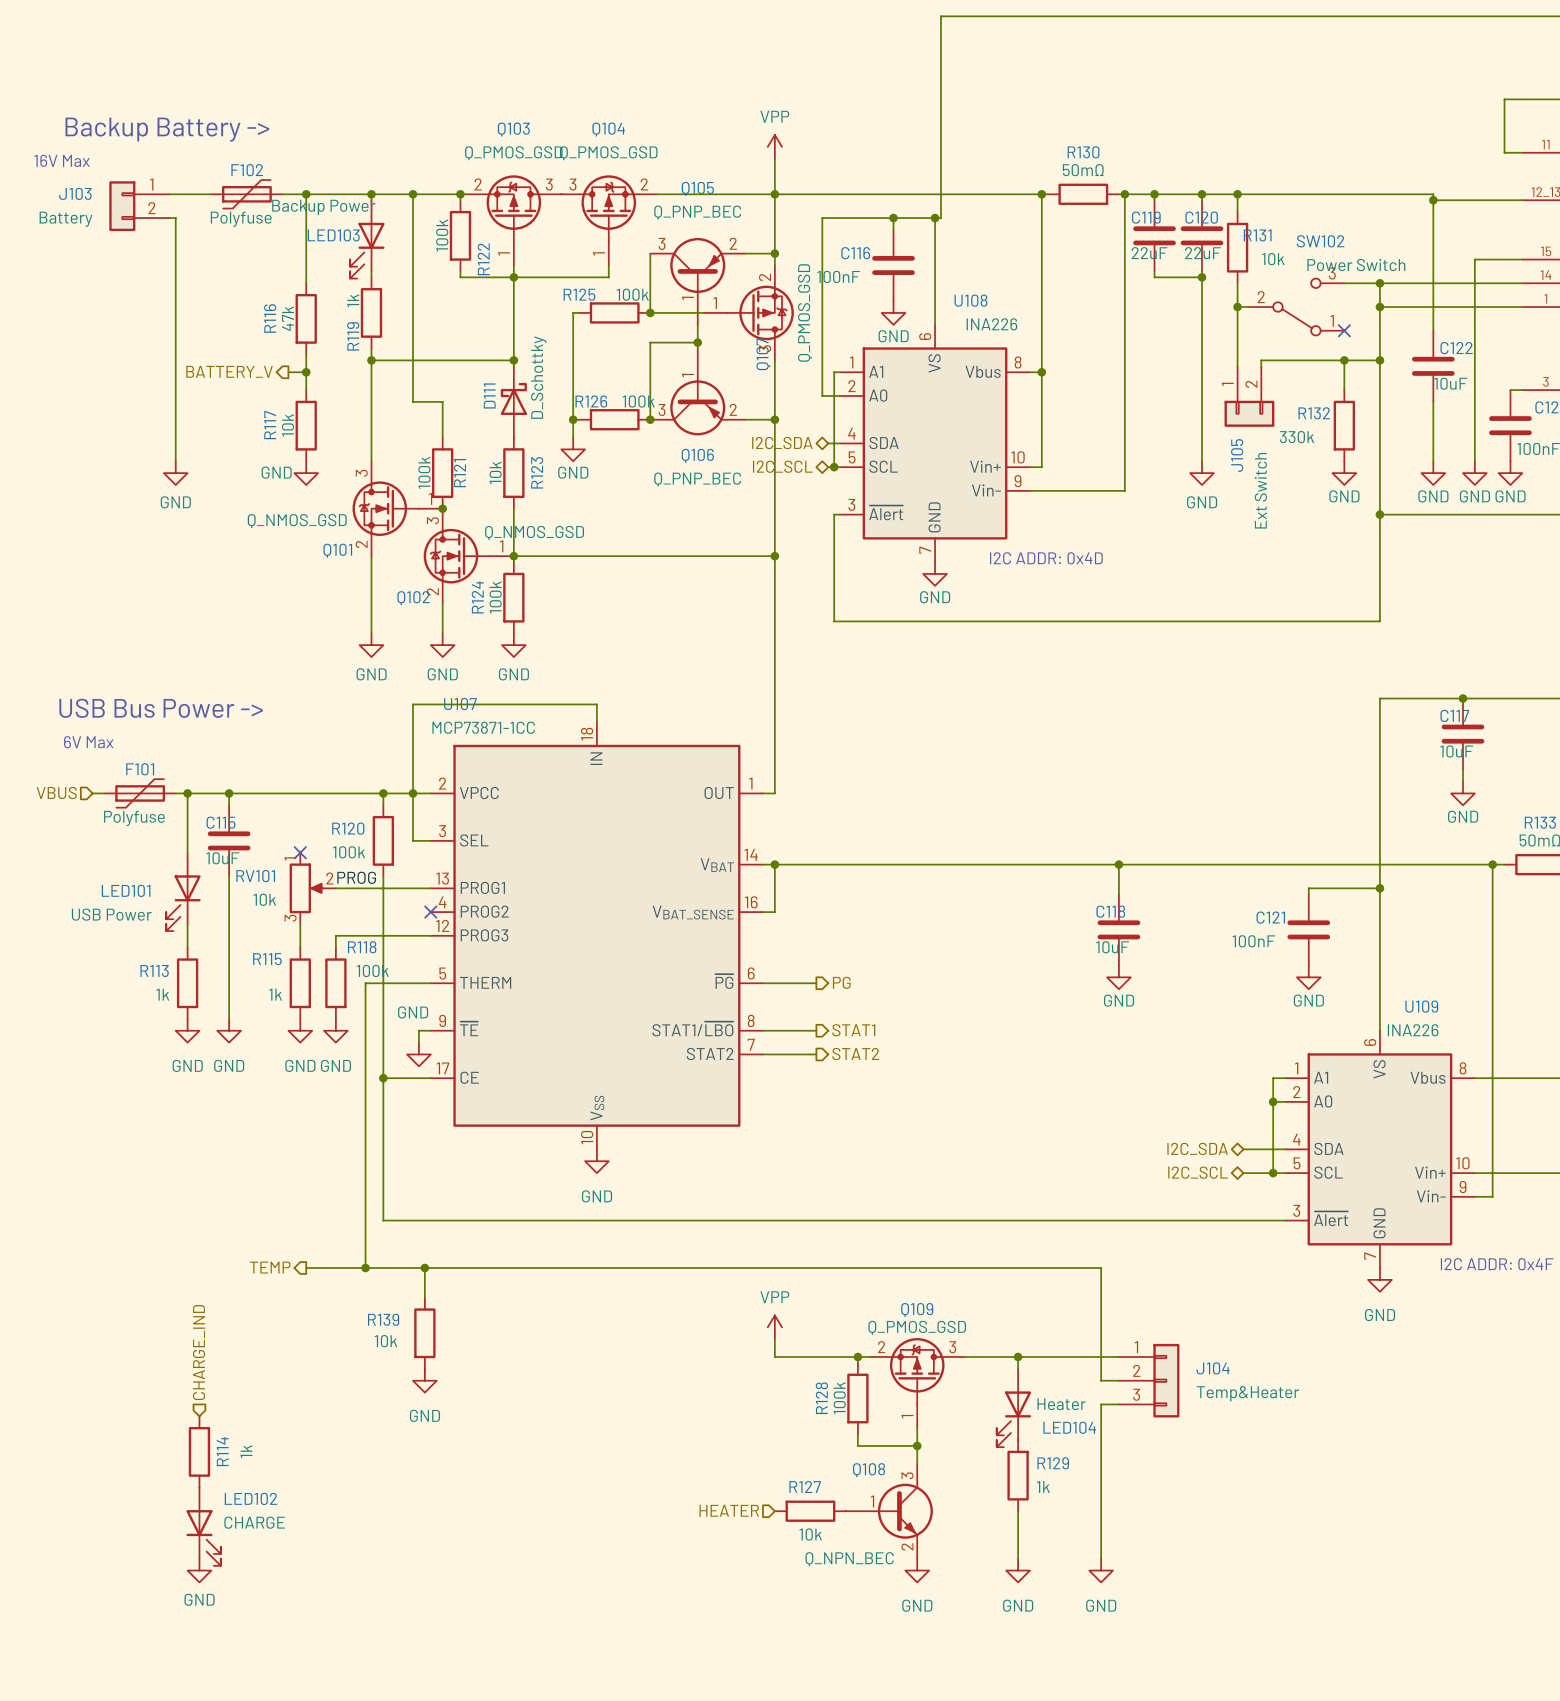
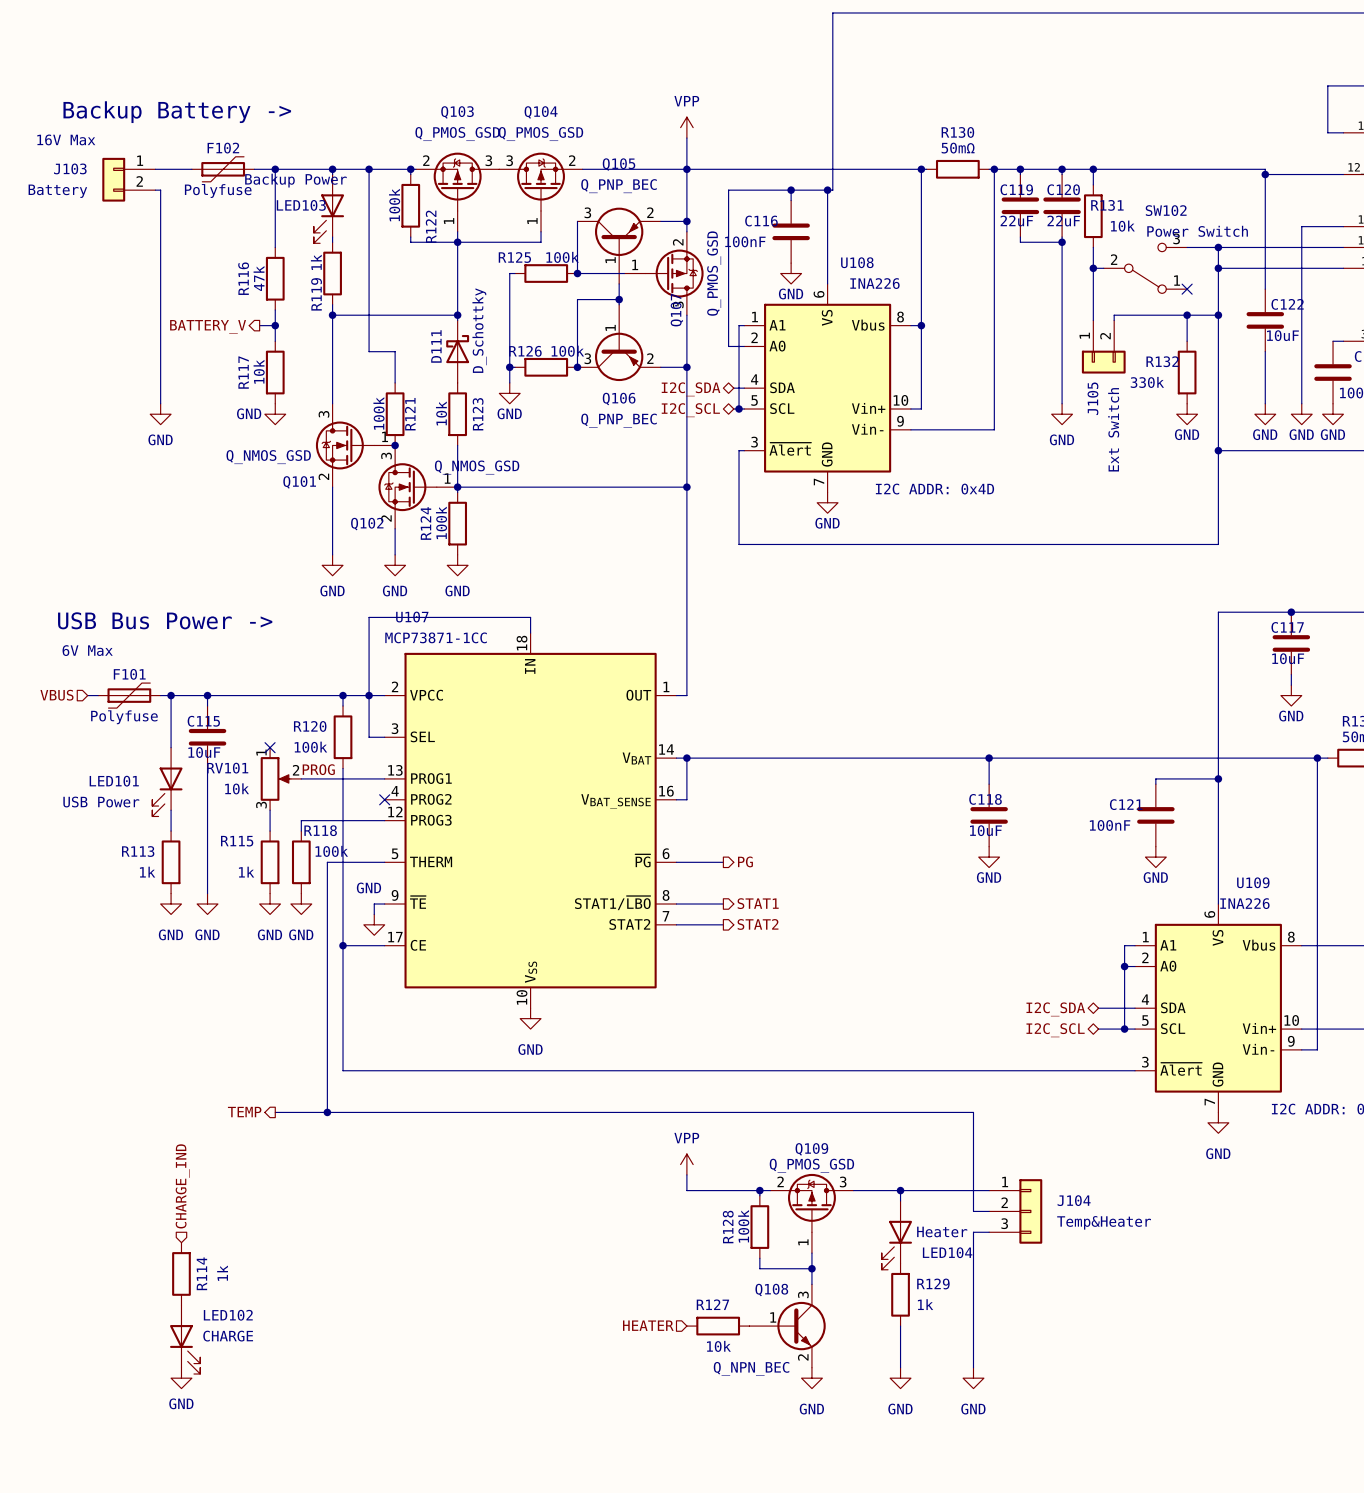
wire: (424, 1268) (424, 1297) -> none
junction: (424, 1268) -> none
R139: 10k (424, 1333) -> none
power symbol: GND (424, 1380) -> none

